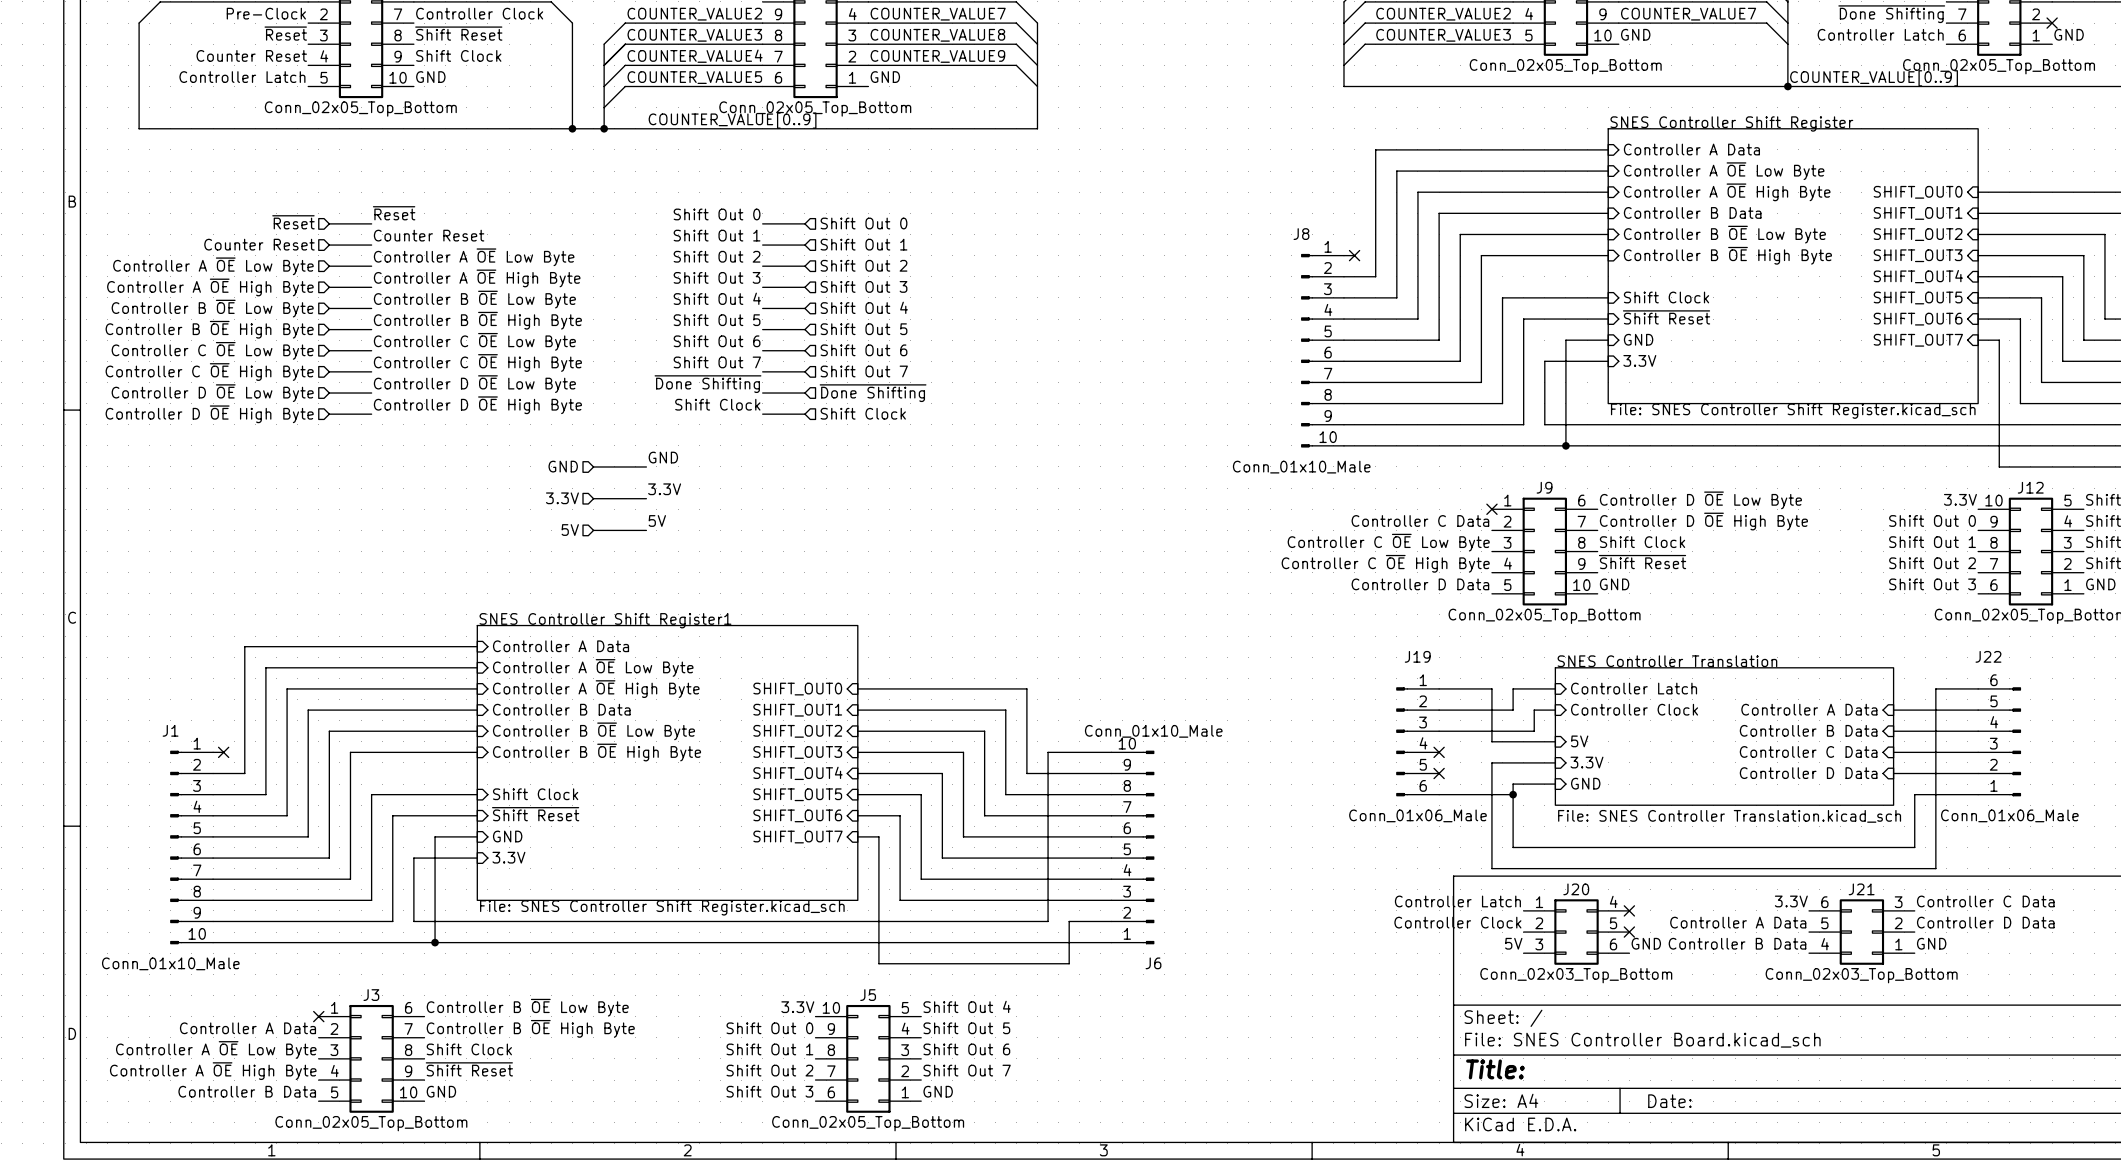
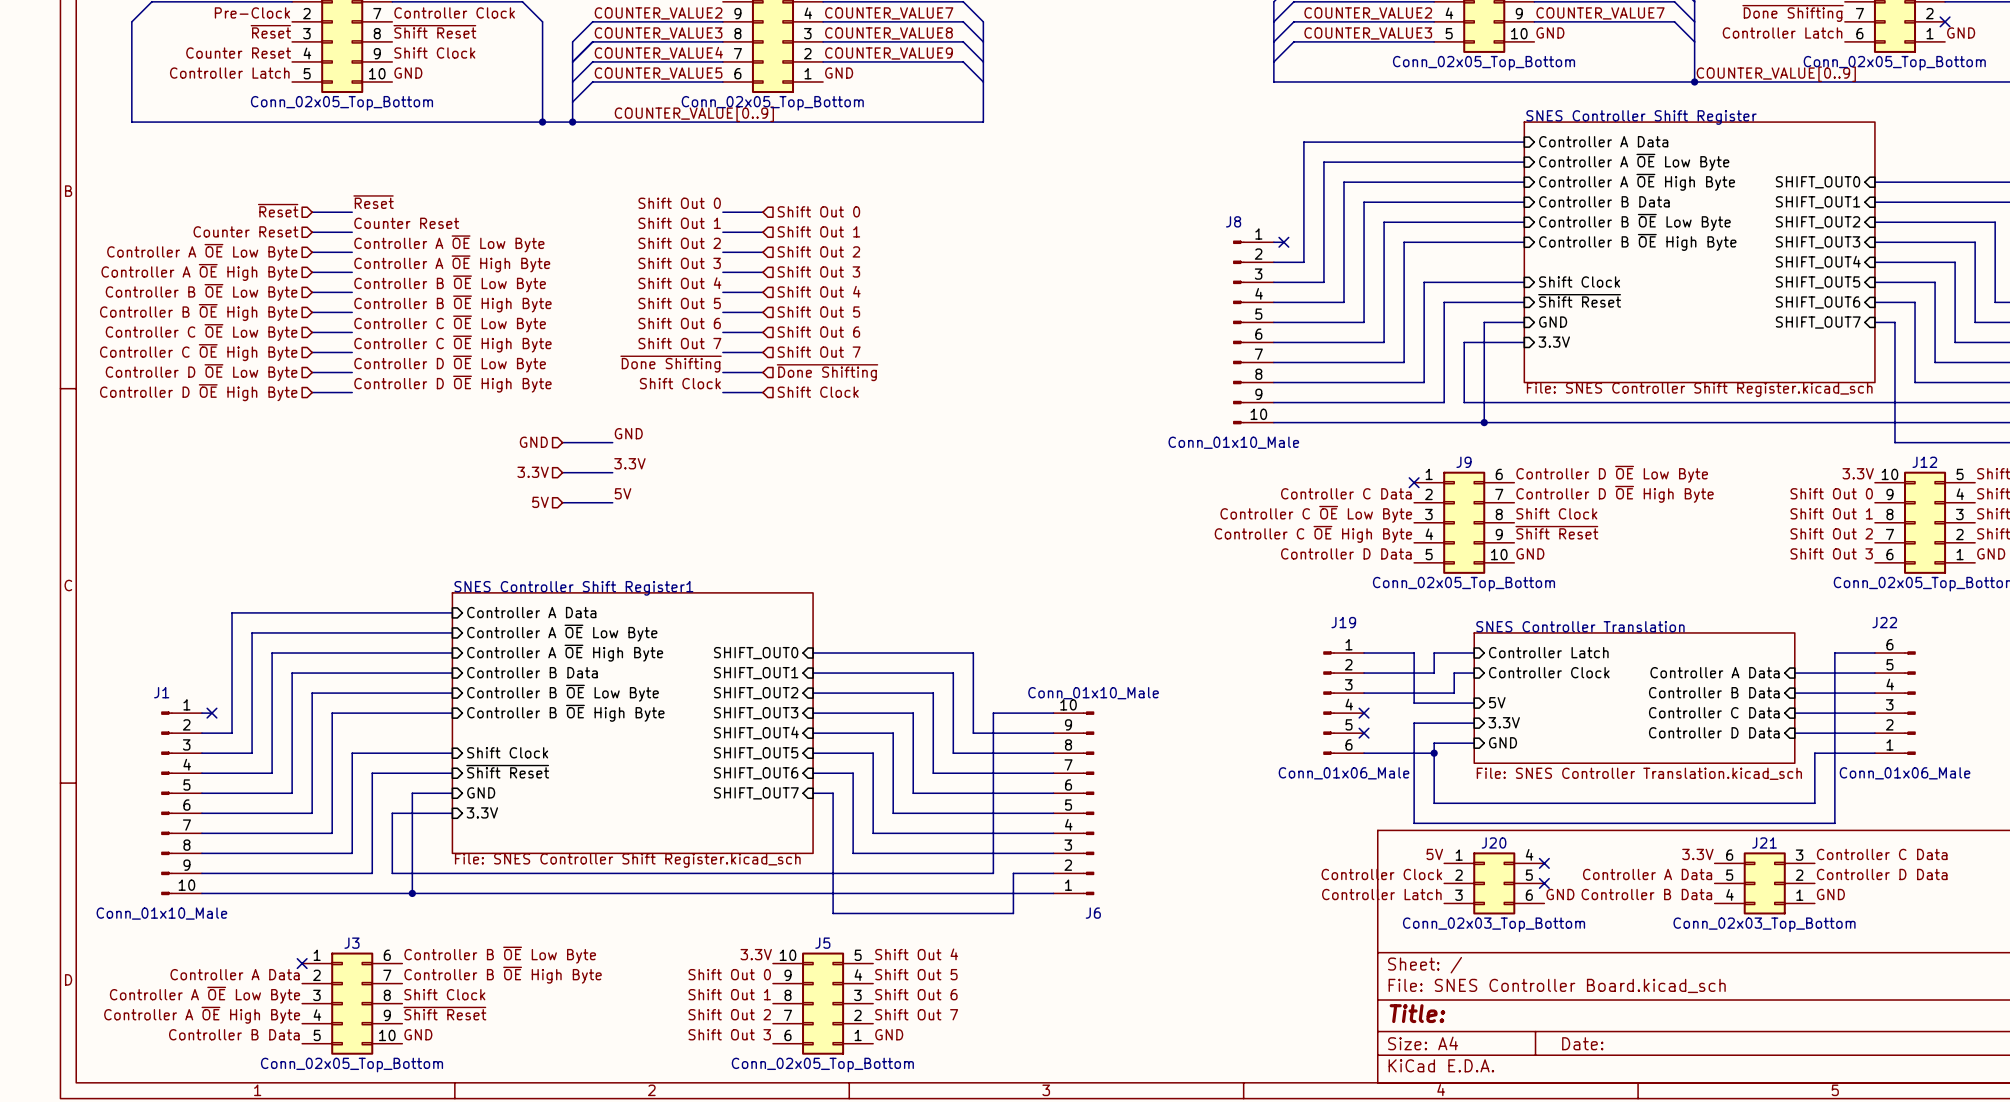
label: Controller Latch (1457, 901) -> 5V (1434, 854)
label: 5V (1513, 943) -> Controller Latch (1381, 894)

